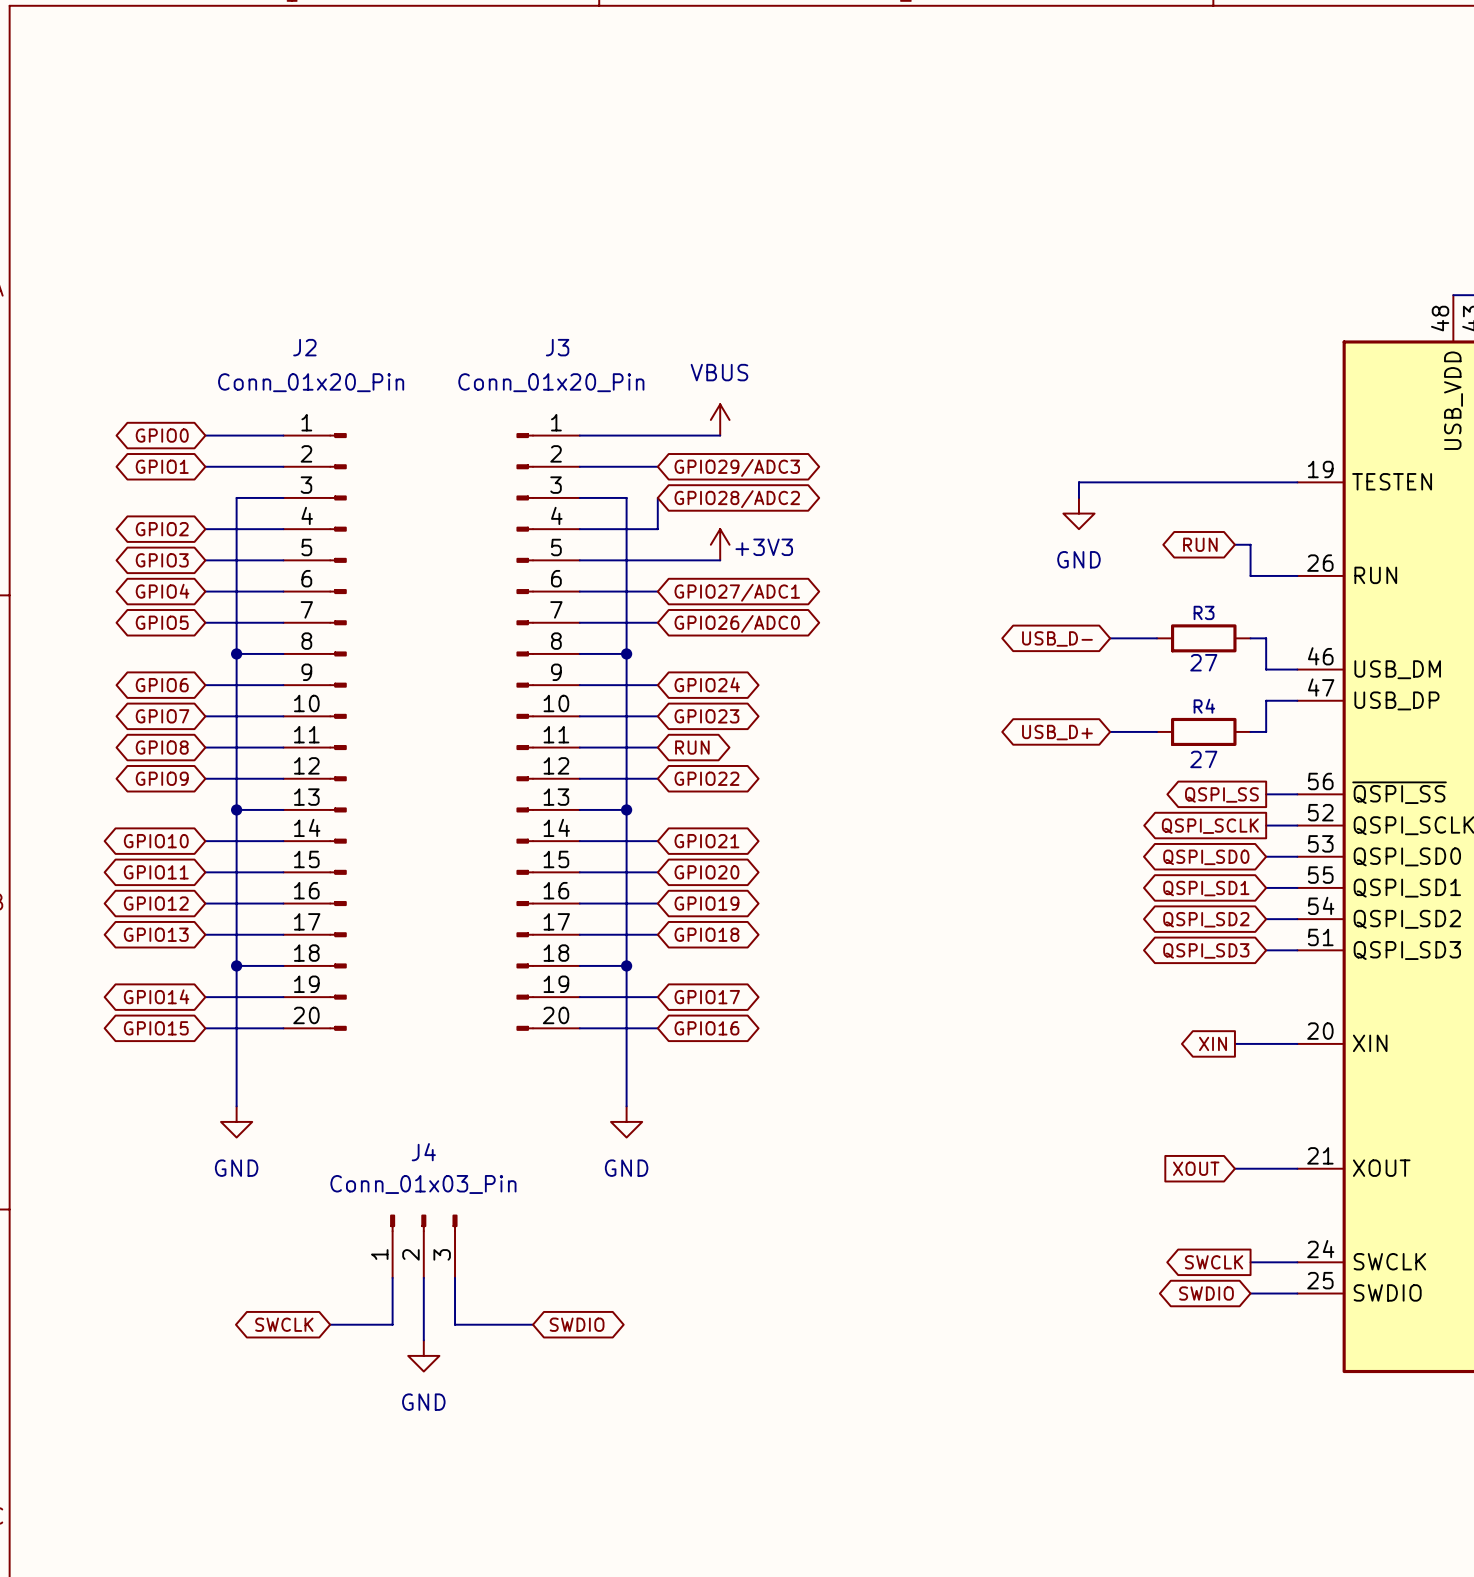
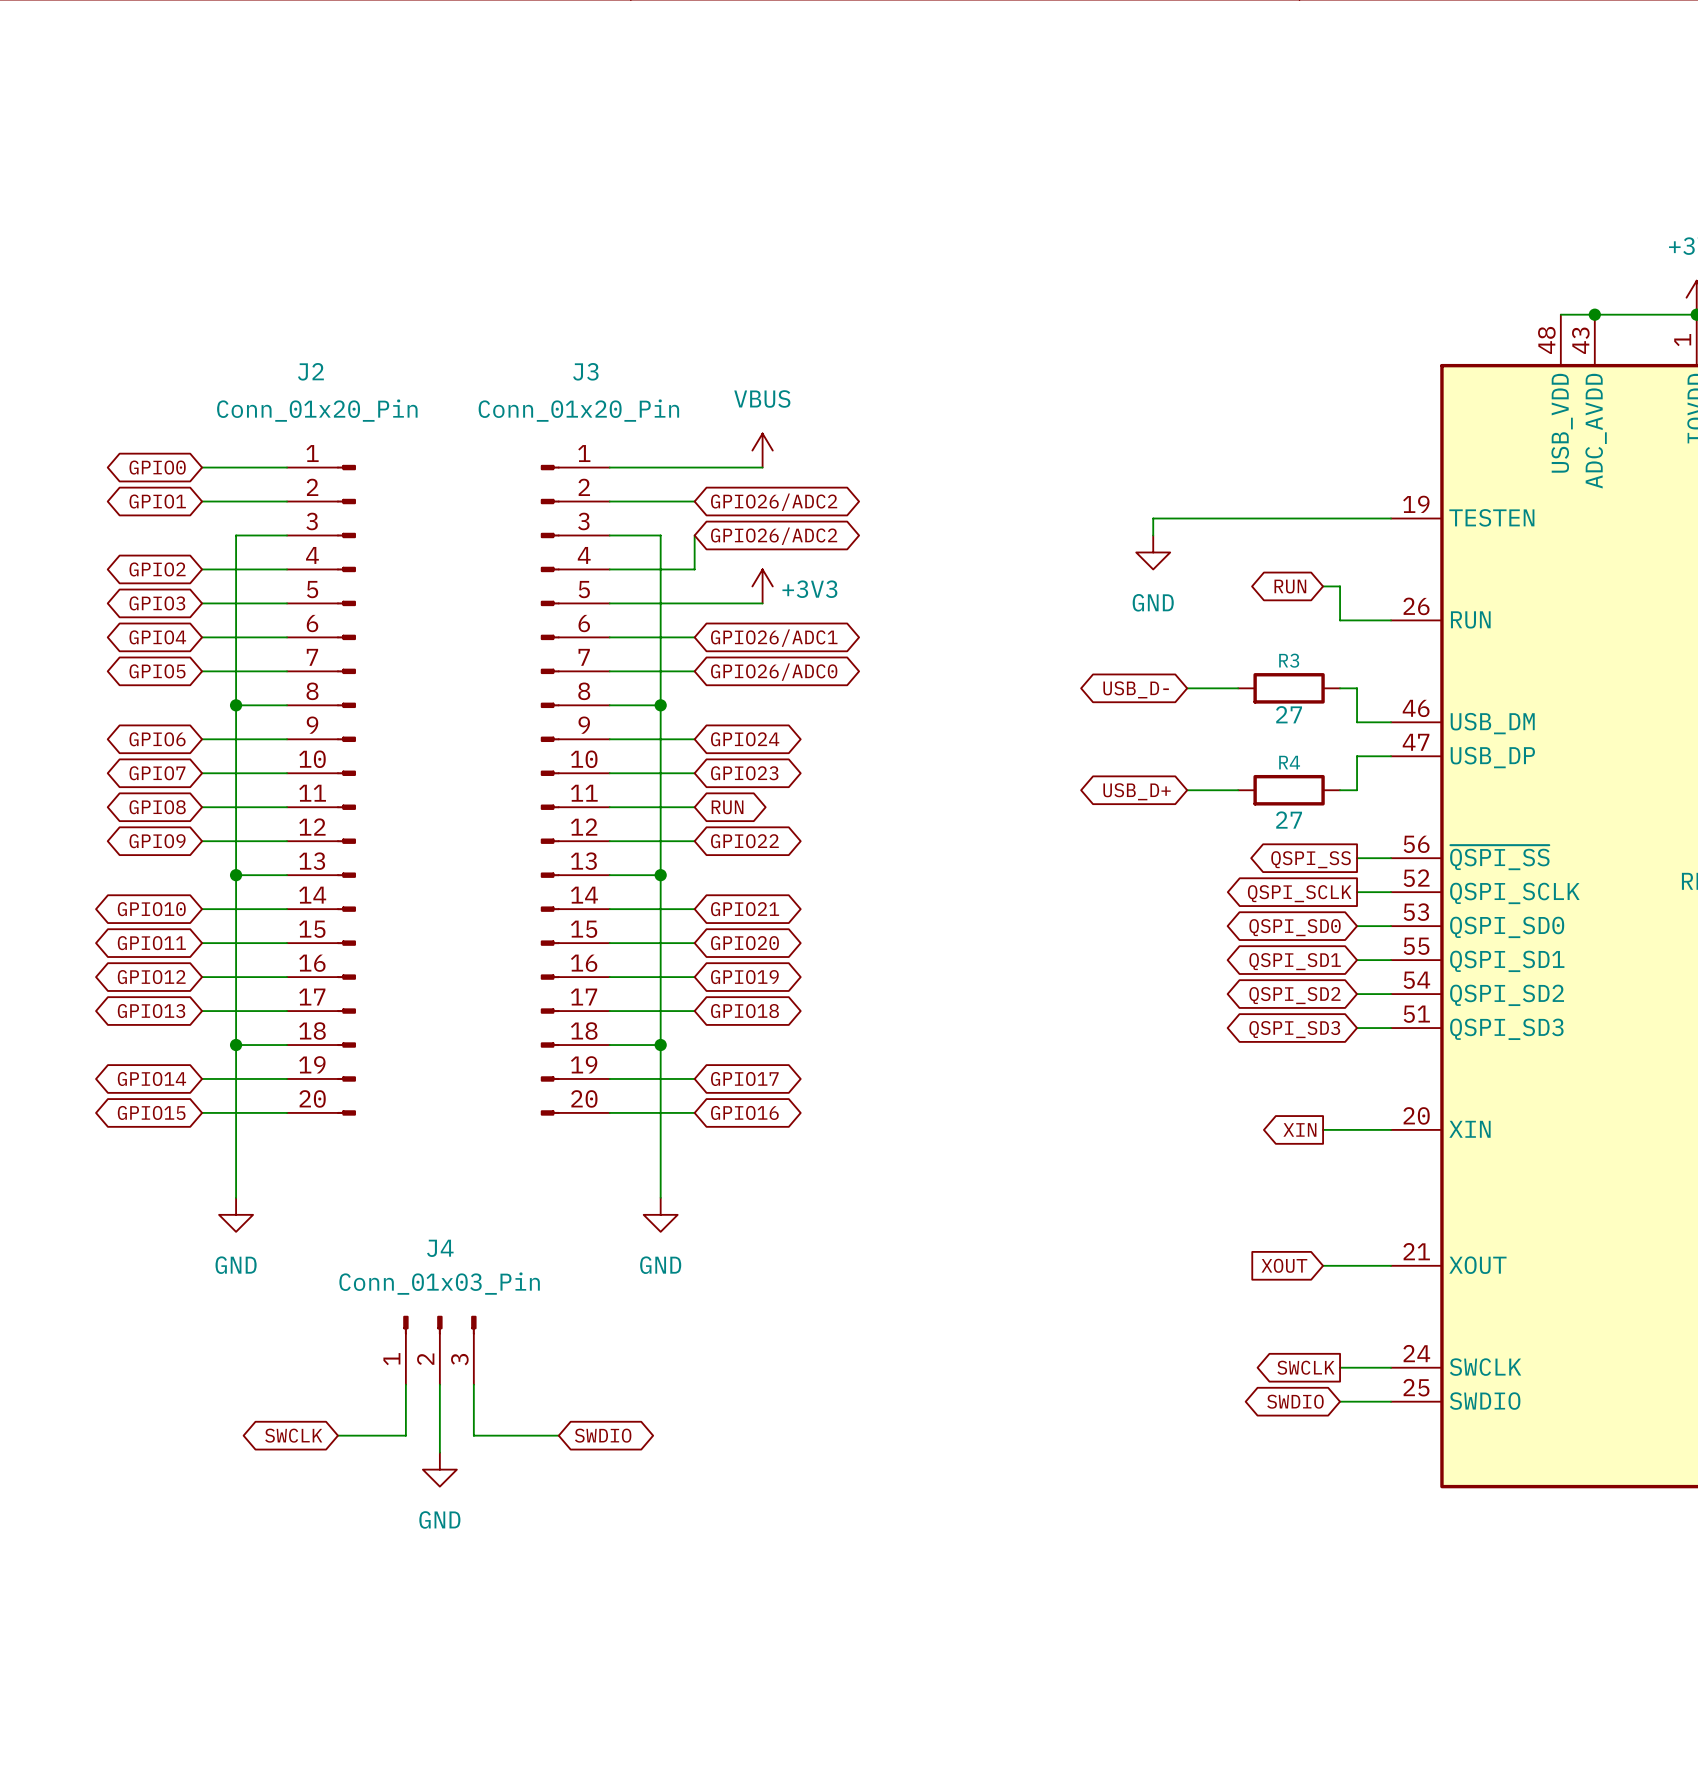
global label: GPIO29/ADC3 (737, 467) -> GPIO26/ADC2 (774, 502)
global label: GPIO28/ADC2 (737, 499) -> GPIO26/ADC2 (774, 536)
global label: GPIO27/ADC1 (737, 592) -> GPIO26/ADC1 (774, 638)

